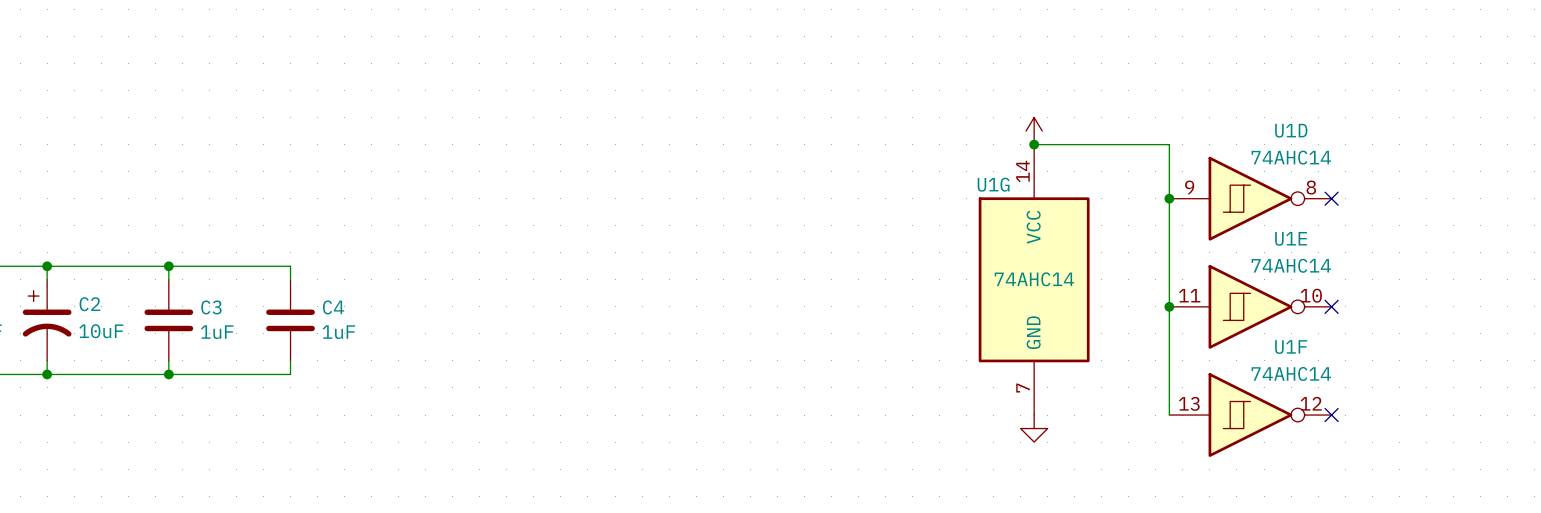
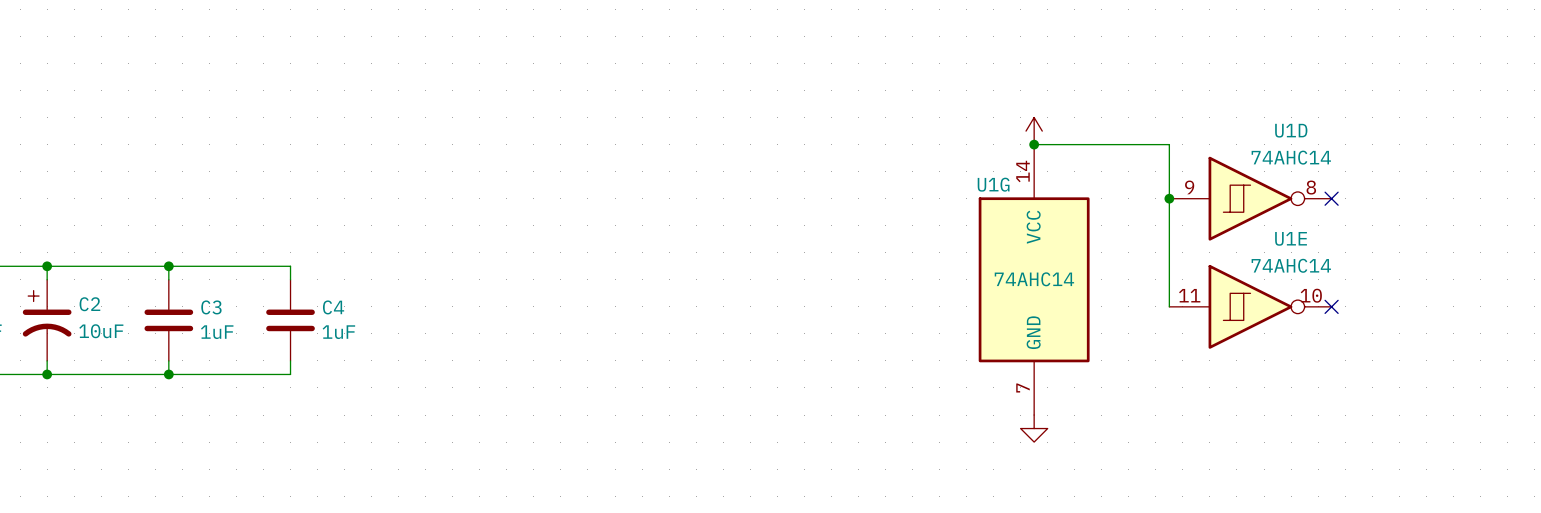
wire: (1169, 306) (1169, 415) -> none
junction: (1169, 306) -> none
U1F: 74AHC14 (1250, 415) -> none
no-connect mark: (1331, 415) -> none

